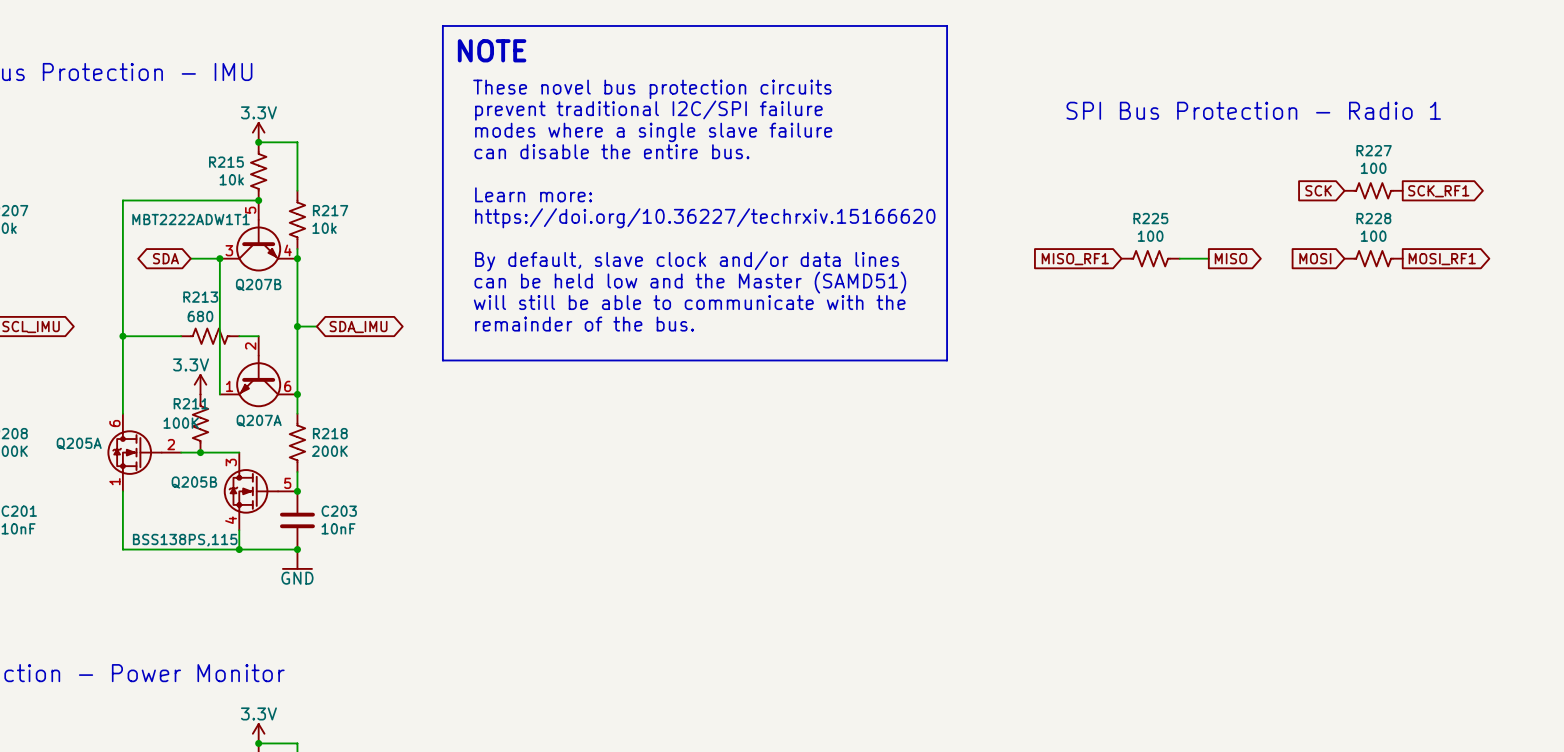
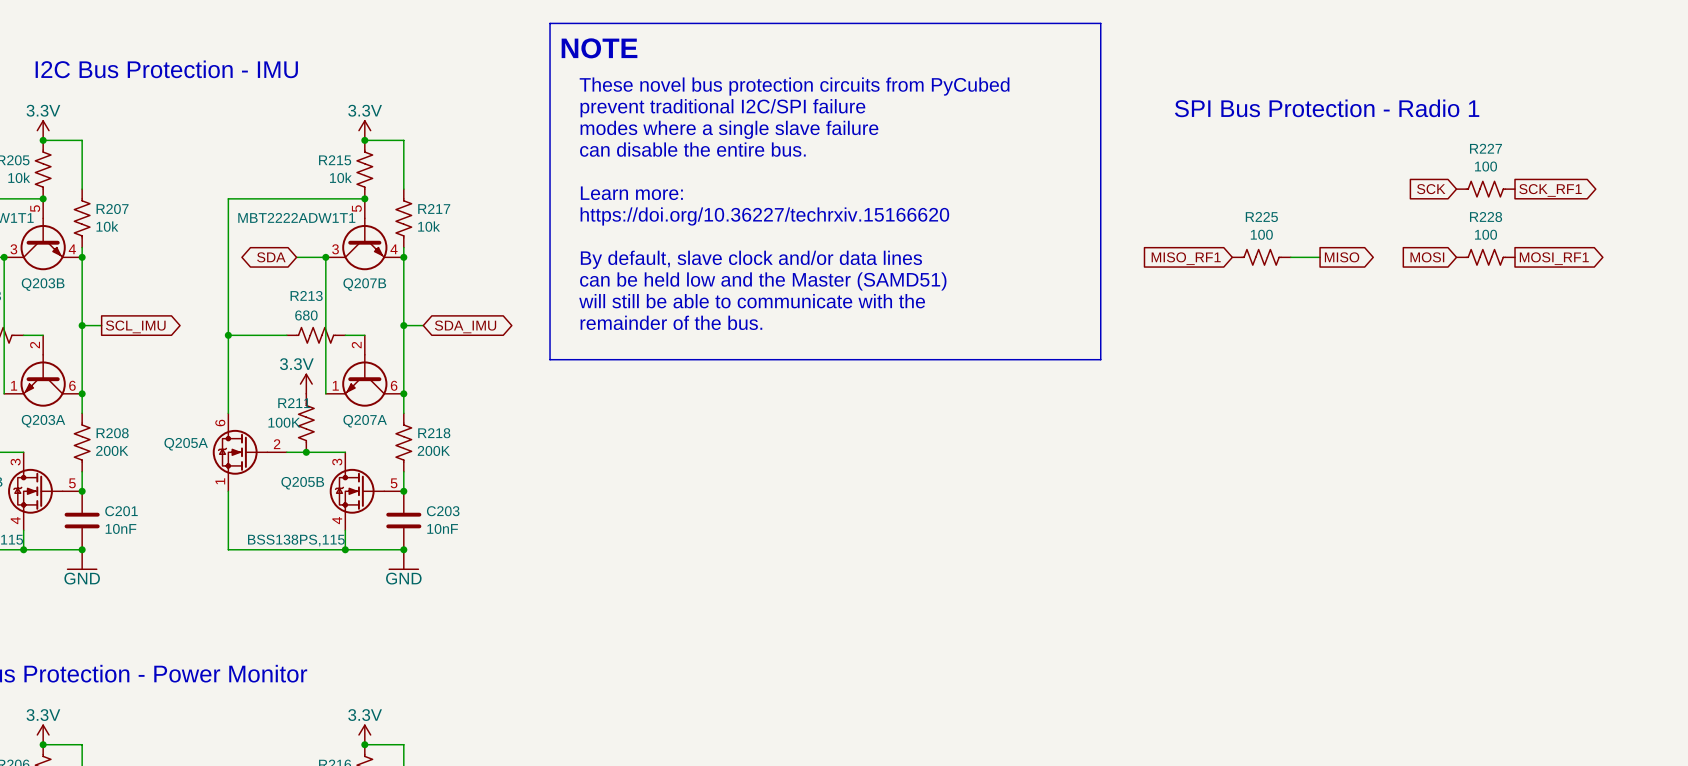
line: (947, 25) (947, 360) -> (1056, 23) (1100, 23) (1100, 359) (1056, 359)
text: These novel bus protection circuits (652, 89) -> These novel bus protection circuits from PyCubed (794, 86)

